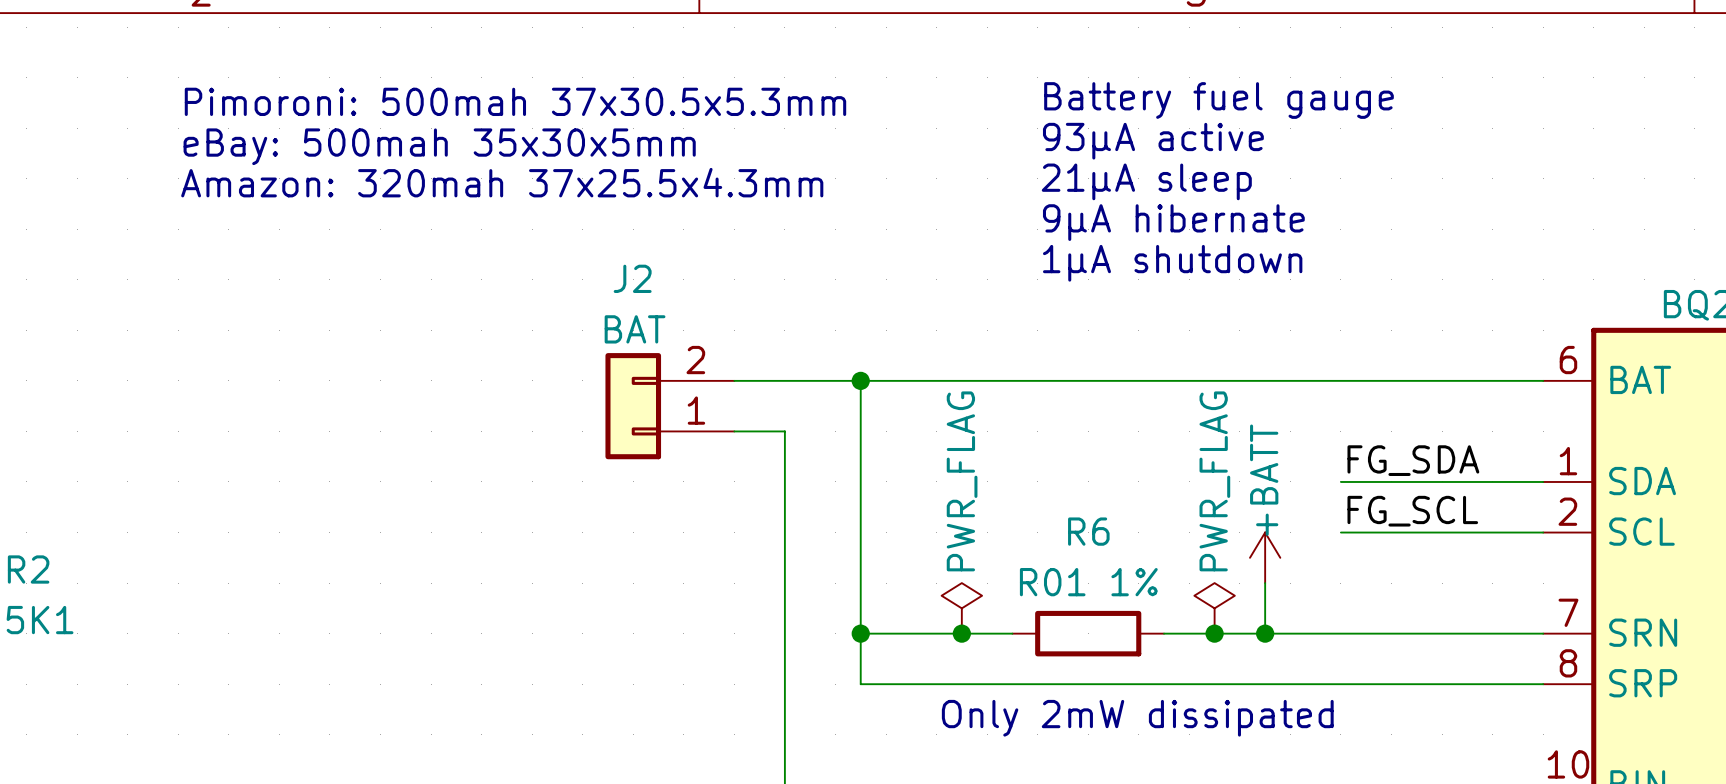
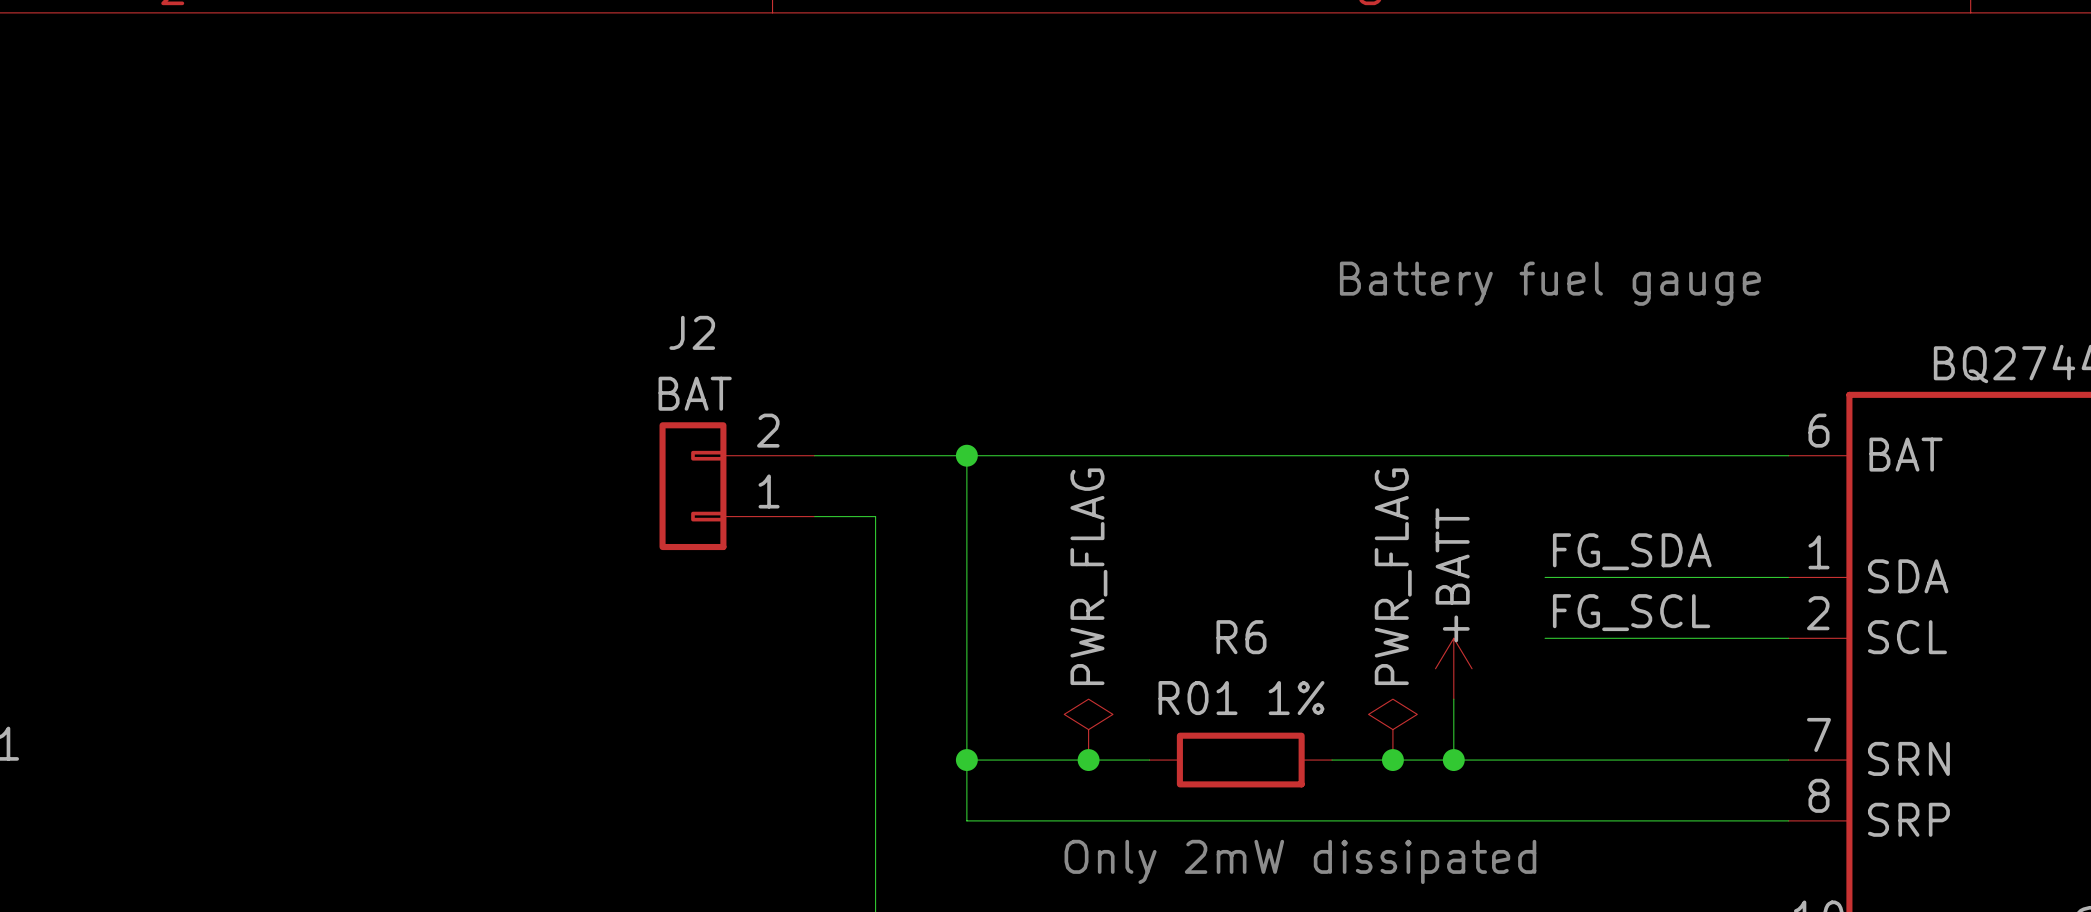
text position: Battery fuel gauge (1219, 100) -> Battery fuel gauge (1550, 283)
text: Pimoroni: 500mah 37x30.5x5.3mm (515, 101) -> none
text: 93μA active (1153, 141) -> none
text: eBay: 500mah 35x30x5mm (439, 146) -> none
text: 21μA sleep (1146, 181) -> none
text: Amazon: 320mah 37x25.5x4.3mm (502, 182) -> none
text: 9μA hibernate (1173, 222) -> none
text: 1μA shutdown (1172, 263) -> none

